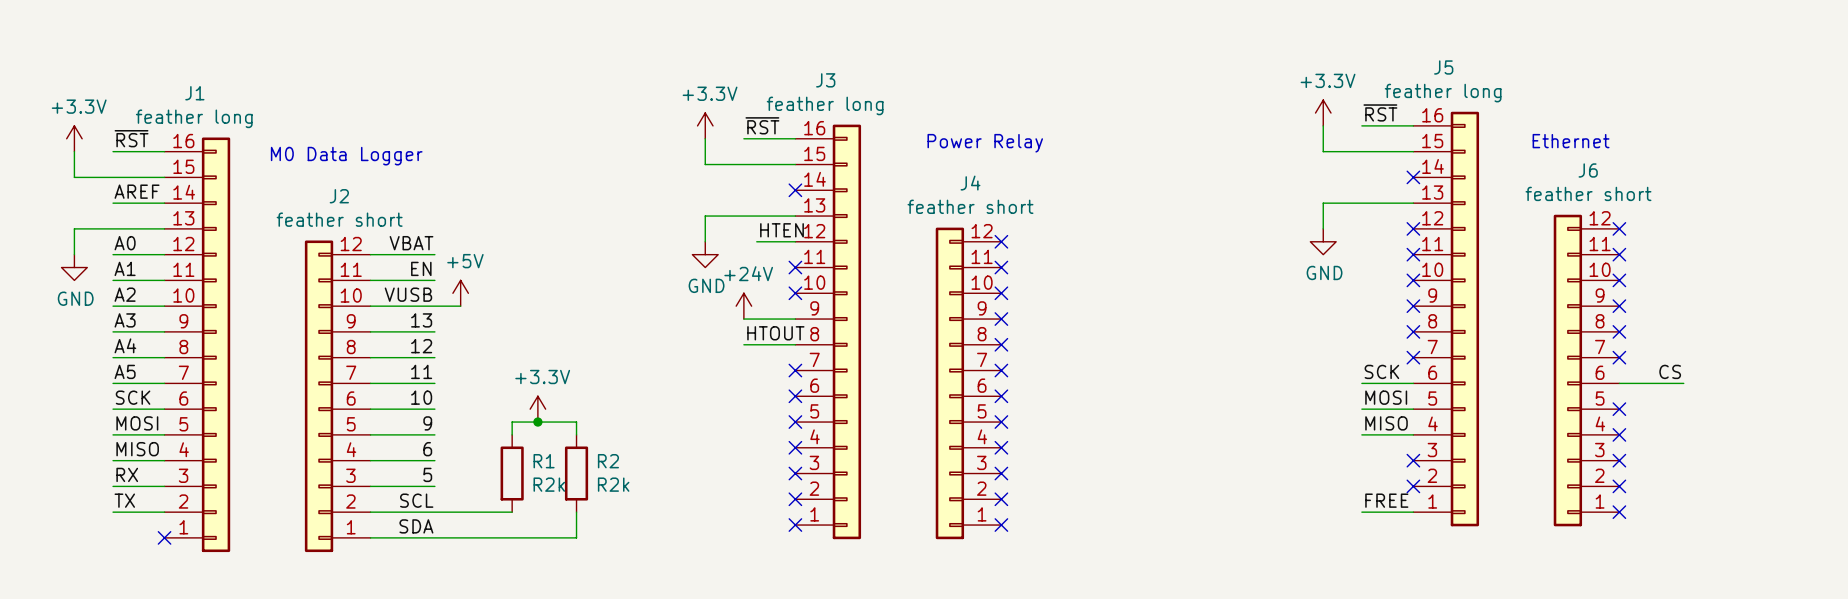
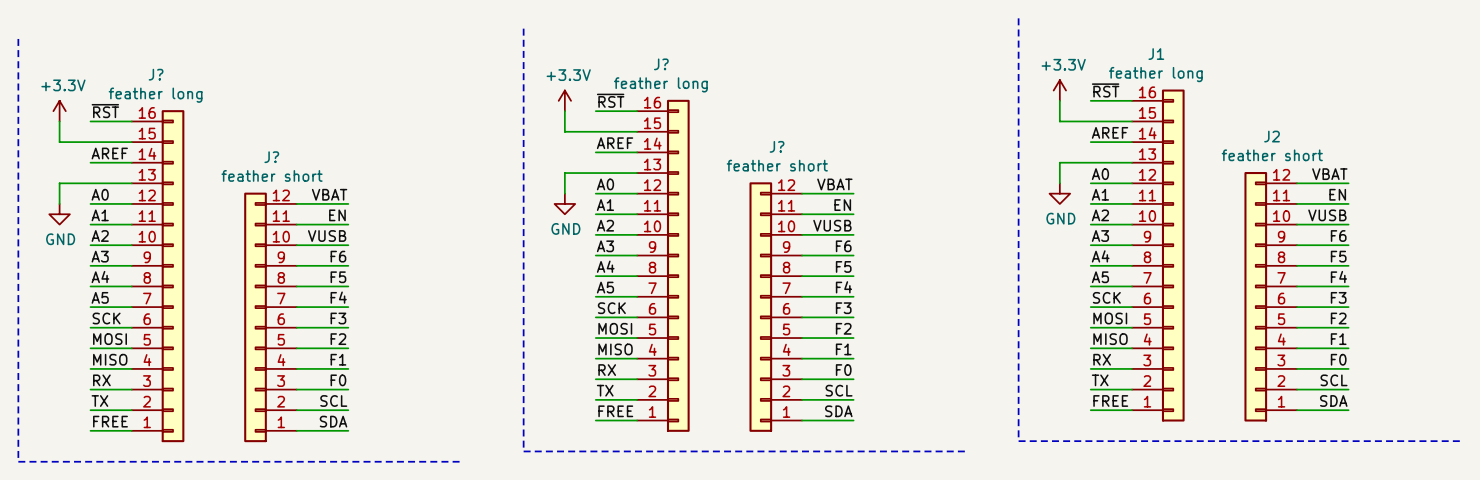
line: none -> (1018, 18) (1018, 441) (1462, 441)
line: none -> (523, 28) (523, 451) (967, 451)
line: none -> (18, 38) (18, 461) (461, 461)
J5 name: J5 (1443, 67) -> J1 (1156, 54)
J3 name: J3 (825, 80) -> J? (661, 64)
J1 name: J1 (194, 93) -> J? (156, 74)
text: Ethernet (1571, 141) -> none
text: Power Relay (985, 143) -> none
text: M0 Data Logger (346, 156) -> none
label: none -> AREF (1110, 132)
J6 name: J6 (1588, 170) -> J2 (1272, 136)
wire: none -> (1090, 142) (1132, 142)
no-connect mark: (1413, 177) -> none
label: none -> AREF (615, 143)
J4 name: J4 (970, 183) -> J? (777, 146)
wire: none -> (595, 152) (637, 152)
no-connect mark: (795, 190) -> none
J2 name: J2 (339, 196) -> J? (271, 157)
label: none -> A0 (1100, 174)
label: none -> VBAT (1329, 174)
wire: none -> (1090, 183) (1132, 183)
no-connect mark: (1413, 228) -> none
wire: none -> (1297, 183) (1348, 183)
no-connect mark: (1619, 228) -> none
label: none -> A0 (605, 184)
label: HTEN (782, 230) -> none
label: none -> VBAT (834, 184)
wire: none -> (595, 193) (606, 193)
wire: none -> (802, 193) (853, 193)
no-connect mark: (1001, 241) -> none
label: none -> A1 (1100, 194)
label: none -> EN (1337, 194)
wire: none -> (1090, 203) (1132, 203)
no-connect mark: (1413, 254) -> none
wire: none -> (1297, 203) (1348, 203)
no-connect mark: (1619, 254) -> none
label: none -> A1 (605, 205)
label: none -> EN (842, 205)
wire: none -> (595, 214) (637, 214)
no-connect mark: (795, 267) -> none
wire: none -> (802, 214) (853, 214)
no-connect mark: (1001, 267) -> none
label: none -> A2 (1100, 215)
label: none -> VUSB (1327, 215)
wire: none -> (1090, 224) (1132, 224)
no-connect mark: (1413, 280) -> none
wire: none -> (1297, 224) (1348, 224)
no-connect mark: (1619, 280) -> none
label: none -> A2 (605, 225)
label: none -> VUSB (832, 225)
power symbol: +5V (460, 293) -> none
wire: none -> (595, 234) (637, 234)
no-connect mark: (795, 293) -> none
wire: none -> (802, 234) (853, 234)
no-connect mark: (1001, 293) -> none
label: none -> A3 (1100, 236)
label: none -> F6 (1338, 236)
wire: (434, 306) (460, 306) -> none
power symbol: +24V (743, 306) -> none
wire: none -> (1090, 245) (1132, 245)
no-connect mark: (1413, 306) -> none
wire: none -> (1297, 245) (1348, 245)
no-connect mark: (1619, 306) -> none
label: none -> A3 (605, 246)
label: none -> F6 (843, 246)
wire: none -> (802, 255) (853, 255)
no-connect mark: (1001, 319) -> none
label: 13 (421, 320) -> F6 (338, 256)
label: none -> A4 (1100, 256)
label: none -> F5 (1338, 256)
wire: none -> (1090, 265) (1132, 265)
no-connect mark: (1413, 331) -> none
wire: none -> (1297, 265) (1348, 265)
no-connect mark: (1619, 331) -> none
label: HTOUT (775, 333) -> A4 (605, 266)
label: none -> F5 (843, 266)
wire: none -> (802, 276) (853, 276)
no-connect mark: (1001, 344) -> none
label: none -> F4 (1338, 277)
label: 12 (421, 346) -> F5 (338, 277)
label: none -> A5 (1100, 277)
wire: none -> (1090, 286) (1132, 286)
no-connect mark: (1413, 357) -> none
wire: none -> (1297, 286) (1348, 286)
no-connect mark: (1619, 357) -> none
label: none -> F4 (843, 287)
label: none -> A5 (605, 287)
wire: none -> (595, 296) (637, 296)
no-connect mark: (795, 370) -> none
wire: none -> (802, 296) (853, 296)
no-connect mark: (1001, 370) -> none
label: 11 (421, 371) -> F4 (338, 297)
label: CS (1670, 371) -> F3 (1338, 297)
label: none -> SCK (611, 308)
label: none -> F3 (843, 308)
wire: none -> (595, 317) (637, 317)
no-connect mark: (795, 396) -> none
wire: none -> (802, 317) (853, 317)
no-connect mark: (1001, 396) -> none
label: 10 (421, 397) -> F3 (338, 318)
label: none -> F2 (1338, 318)
power symbol: +3.3V (537, 409) -> none
wire: none -> (1297, 327) (1348, 327)
no-connect mark: (1619, 409) -> none
label: none -> MOSI (615, 328)
label: none -> F2 (843, 328)
junction: (537, 422) -> none
wire: none -> (595, 338) (637, 338)
no-connect mark: (795, 422) -> none
wire: none -> (802, 338) (853, 338)
no-connect mark: (1001, 422) -> none
label: 9 (427, 423) -> F2 (338, 339)
label: none -> F1 (1338, 339)
wire: (512, 434) (512, 422) (576, 422) (576, 434) -> none
wire: none -> (1297, 348) (1348, 348)
no-connect mark: (1619, 434) -> none
label: none -> MISO (615, 349)
label: none -> F1 (843, 349)
wire: none -> (595, 358) (637, 358)
no-connect mark: (795, 447) -> none
wire: none -> (802, 358) (853, 358)
no-connect mark: (1001, 447) -> none
label: 6 (427, 449) -> F1 (338, 359)
label: none -> RX (1102, 359)
label: none -> F0 (1338, 359)
wire: none -> (1090, 368) (1132, 368)
no-connect mark: (1413, 460) -> none
wire: none -> (1297, 368) (1348, 368)
no-connect mark: (1619, 460) -> none
label: none -> RX (607, 370)
label: none -> F0 (843, 370)
R1: R2k (512, 473) -> none
R2: R2k (576, 473) -> none
wire: none -> (595, 379) (637, 379)
no-connect mark: (795, 473) -> none
wire: none -> (802, 379) (853, 379)
no-connect mark: (1001, 473) -> none
label: 5 (427, 474) -> F0 (338, 380)
label: none -> TX (1100, 380)
label: none -> SCL (1334, 380)
wire: none -> (1090, 389) (1132, 389)
no-connect mark: (1413, 486) -> none
wire: none -> (1297, 389) (1348, 389)
no-connect mark: (1619, 486) -> none
label: none -> TX (605, 390)
label: none -> SCL (839, 390)
wire: none -> (595, 399) (637, 399)
no-connect mark: (795, 499) -> none
wire: none -> (802, 399) (853, 399)
no-connect mark: (1001, 499) -> none
label: none -> SDA (1333, 401)
wire: (434, 512) (512, 512) -> none
wire: (576, 512) (576, 537) (434, 537) -> none
wire: none -> (1297, 410) (1348, 410)
no-connect mark: (1619, 512) -> none
label: none -> FREE (615, 411)
label: none -> SDA (838, 411)
wire: none -> (595, 420) (637, 420)
no-connect mark: (795, 525) -> none
wire: none -> (802, 420) (853, 420)
no-connect mark: (1001, 525) -> none
label: none -> FREE (110, 421)
wire: none -> (90, 430) (131, 430)
no-connect mark: (164, 537) -> none

